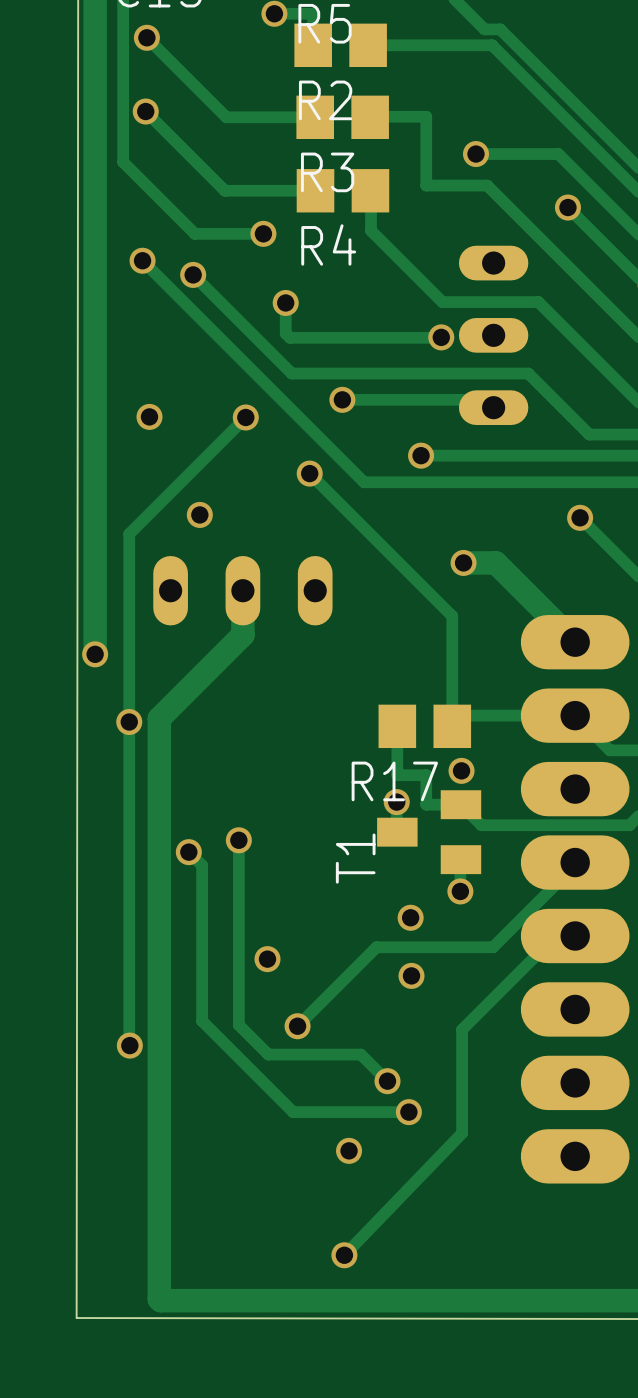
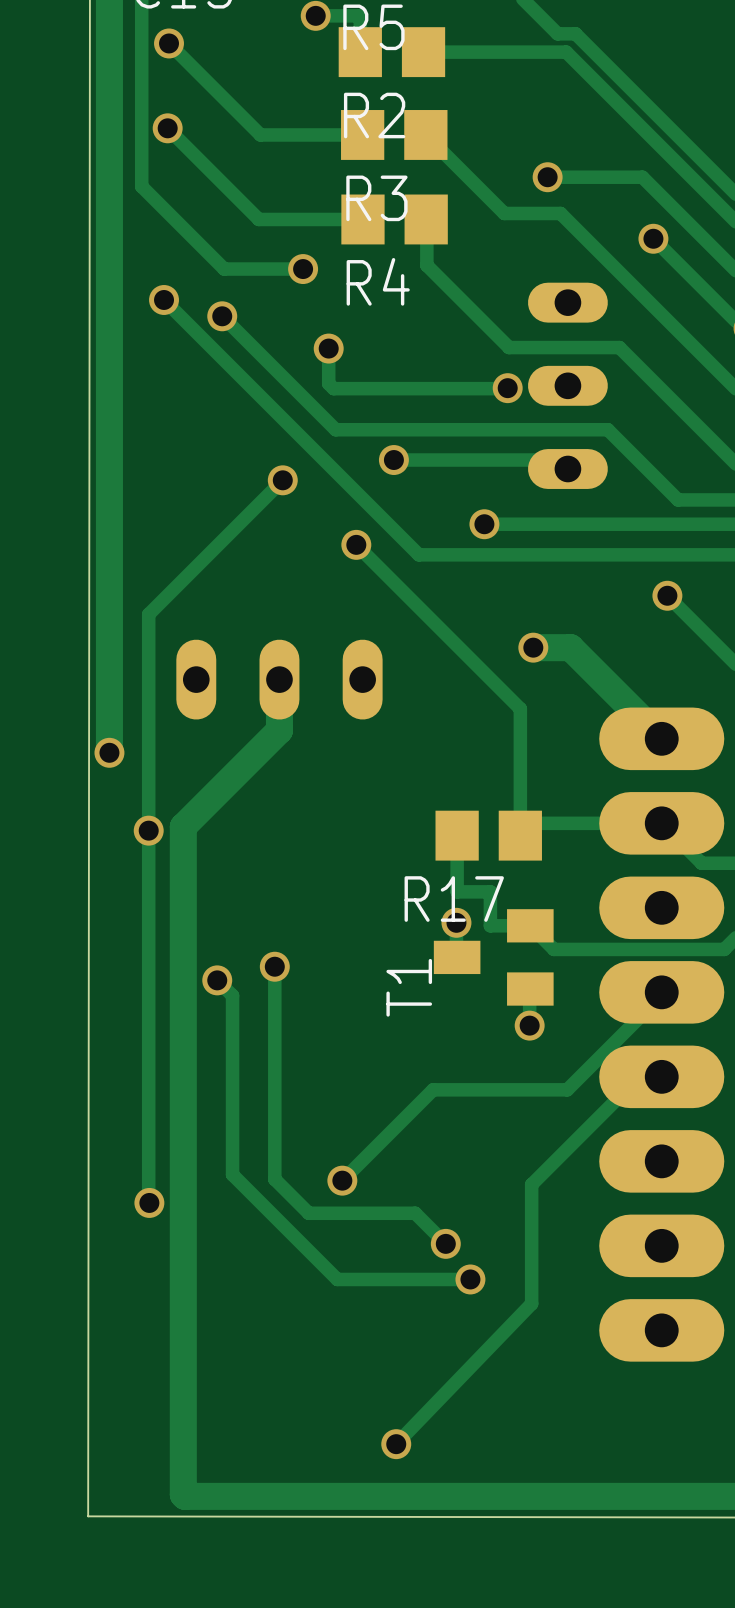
track: (370, 116) (426, 116) (426, 185) (438, 185) -> (425, 134) (504, 213)
via: (149, 416) -> none
via: (199, 514) -> none
via: (461, 770) -> none
via: (410, 917) -> none
via: (267, 959) -> none
via: (411, 975) -> none
via: (349, 1150) -> none

